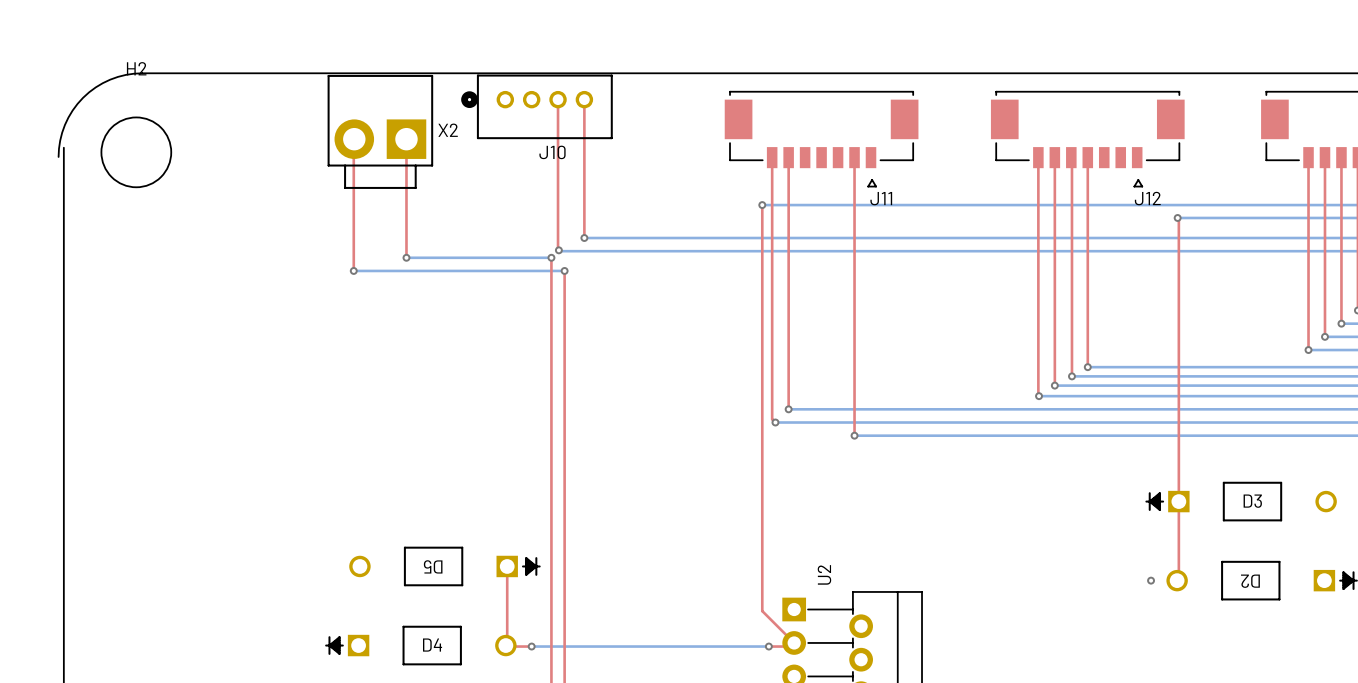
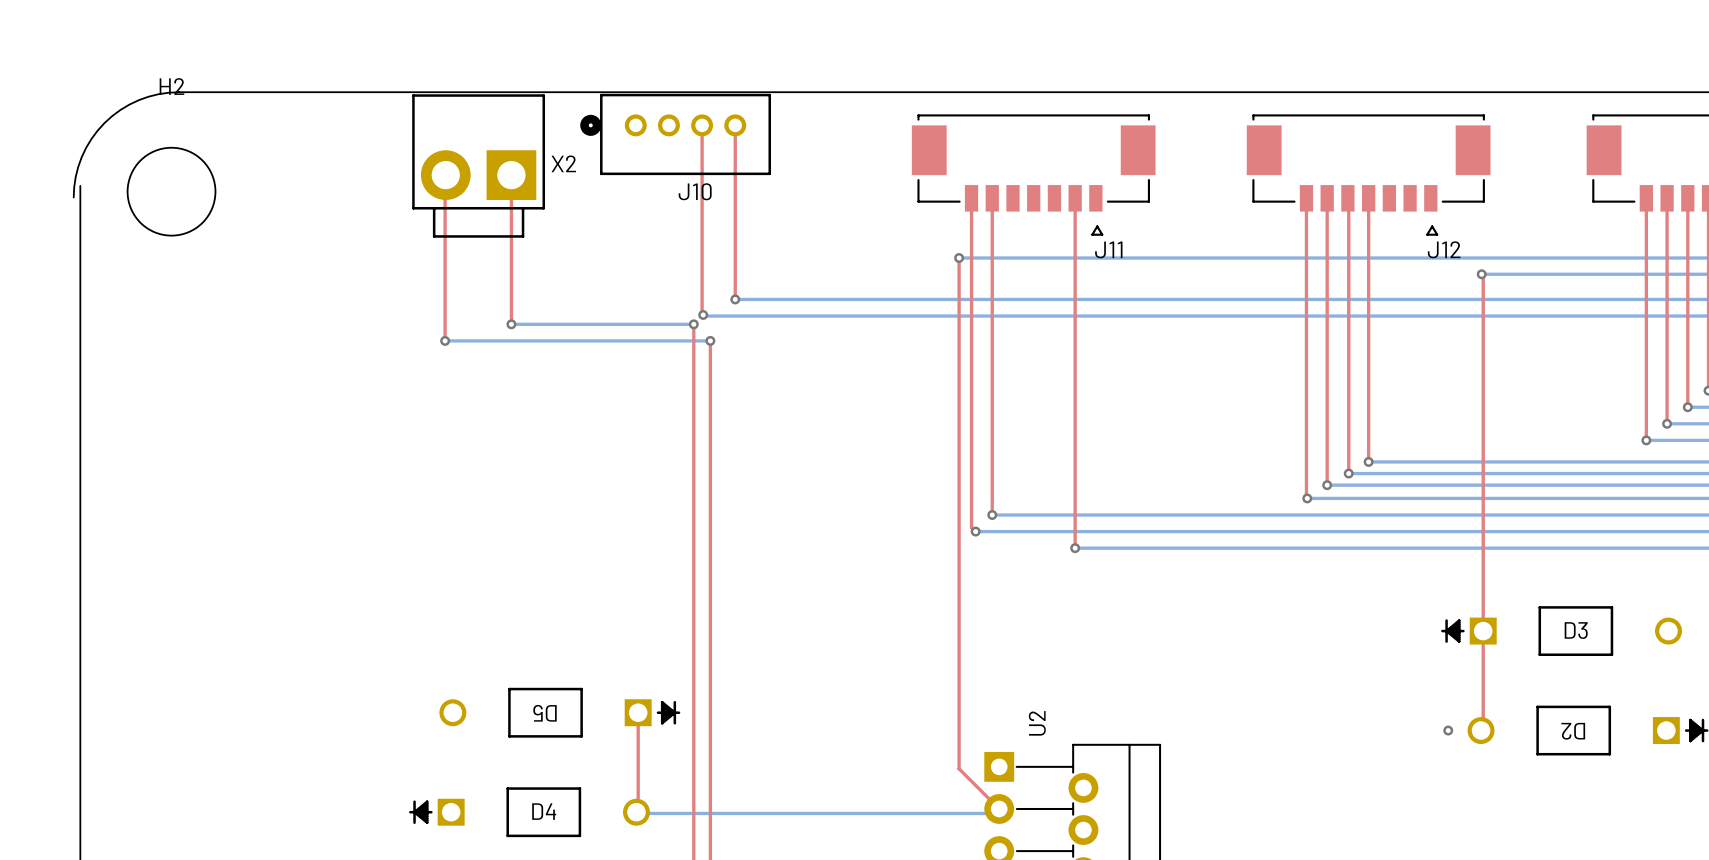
bottom track: none -> (999, 808) (994, 813) (967, 813)
bottom track: none -> (636, 812) (668, 813)
top track: (505, 646) (531, 646) -> none
via: (531, 646) -> none
top track: (768, 646) (790, 646) -> none
via: (768, 646) -> none

